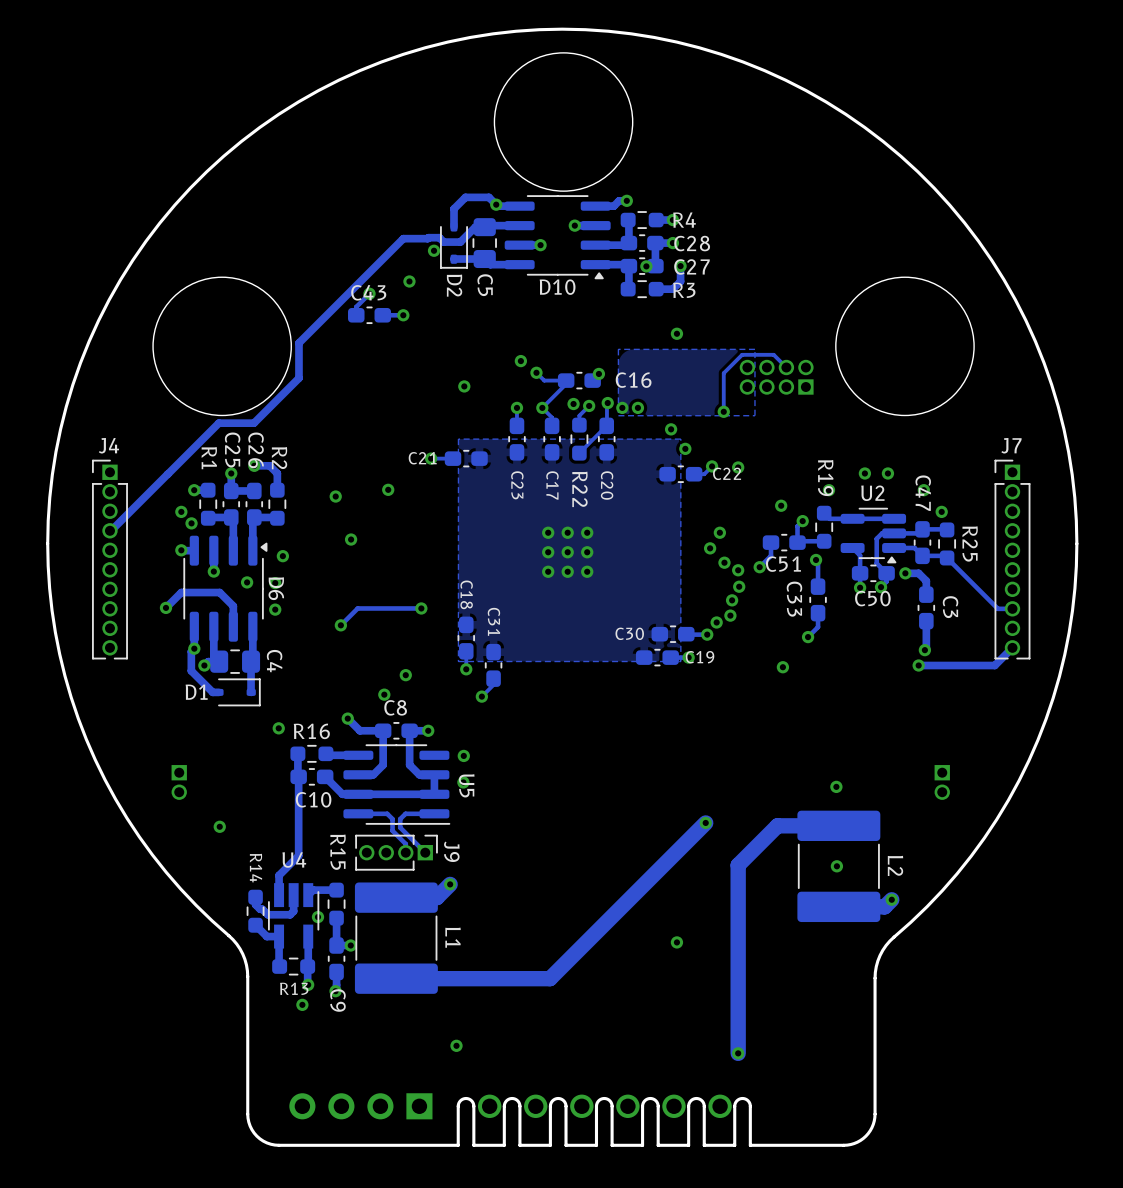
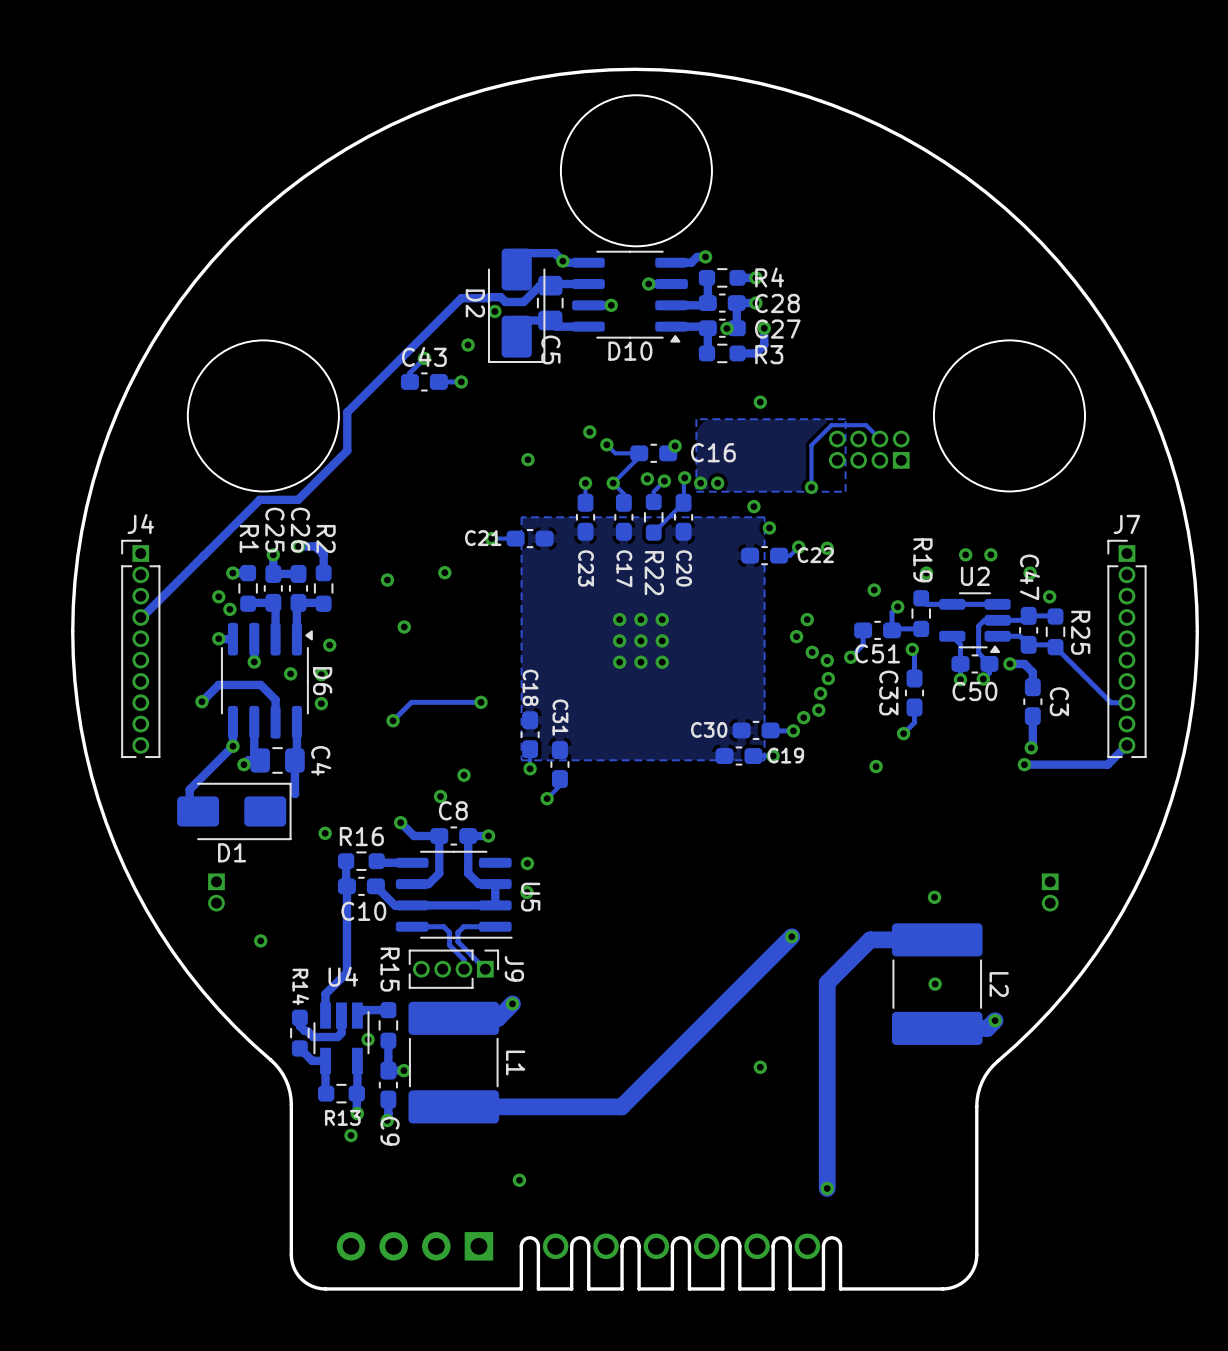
D2 footprint: [440, 222, 468, 269] -> [488, 248, 546, 363]
D2 name position: D2 (454, 285) -> D2 (475, 303)
track: (191, 651) (191, 670) (212, 692) (218, 692) -> (229, 749) (189, 789) (189, 811)
D1 footprint: [214, 678, 261, 707] -> [177, 782, 292, 841]
D1 name position: D1 (196, 692) -> D1 (232, 852)

